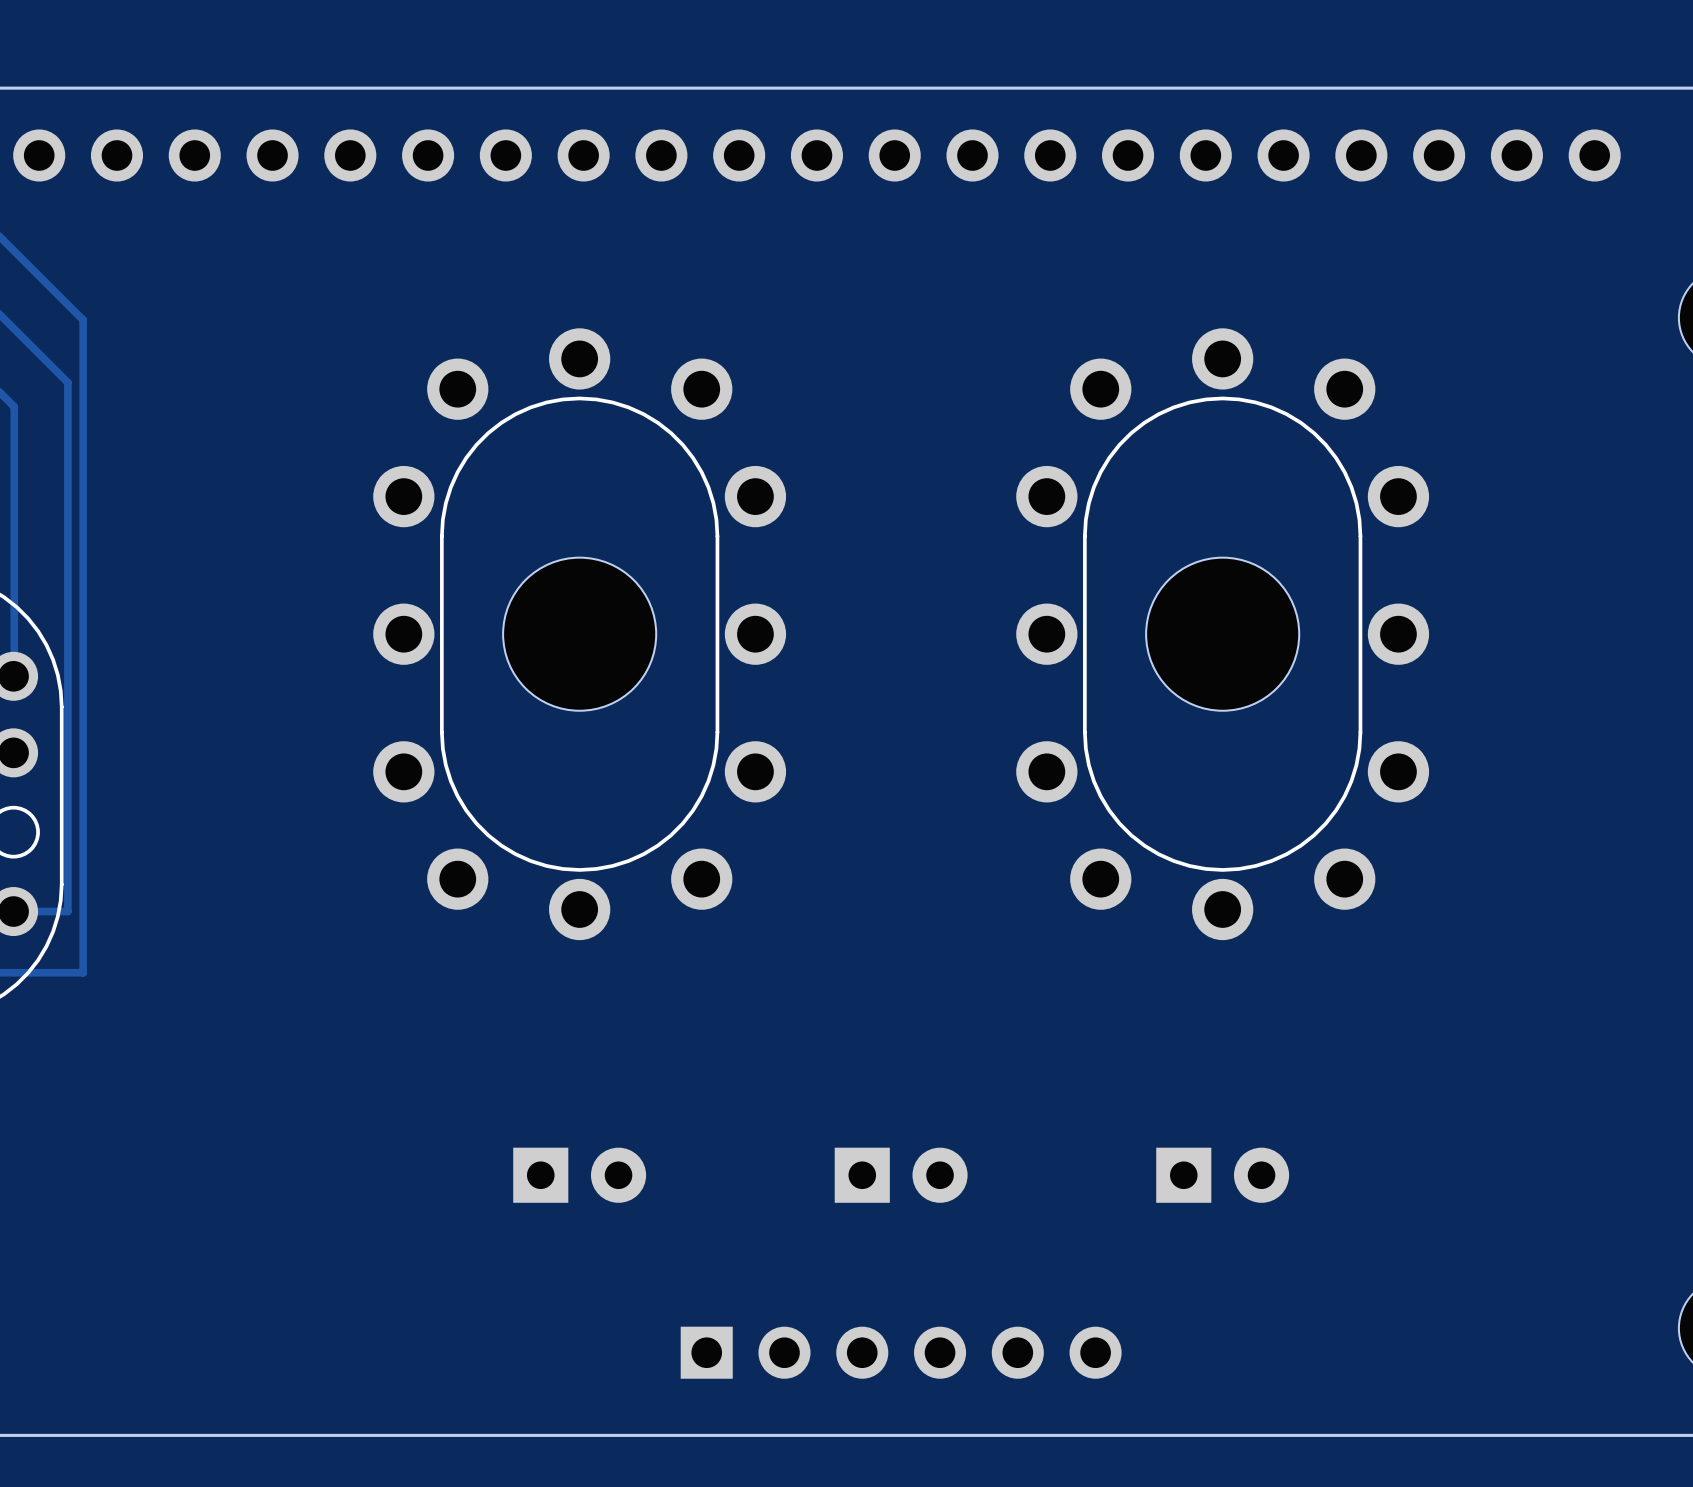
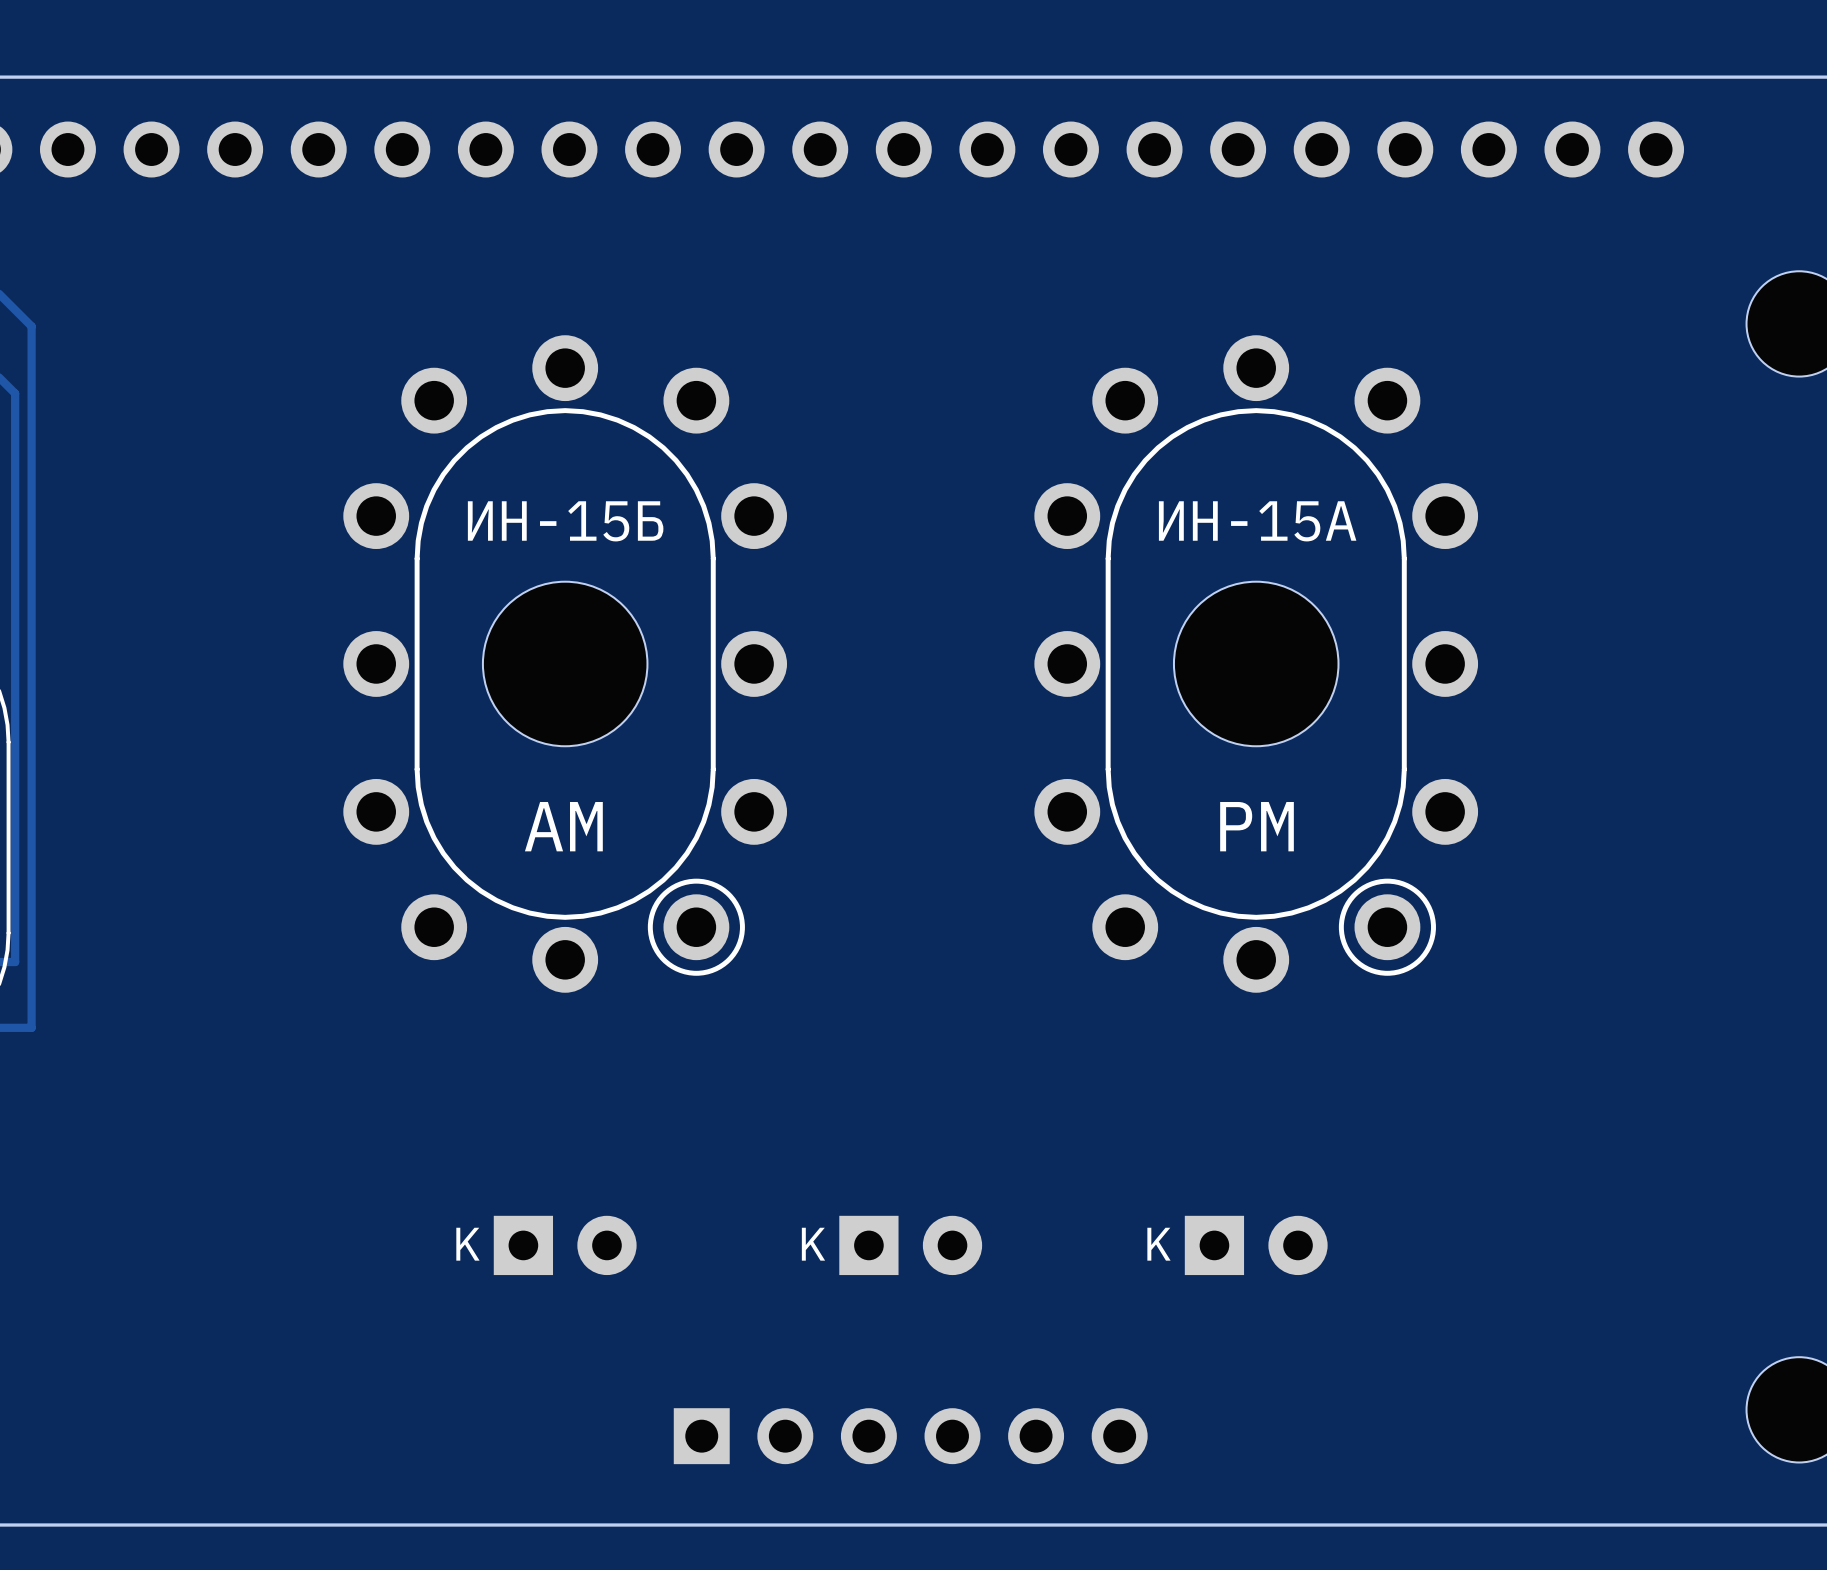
part footprint: [373, 328, 787, 941] -> [343, 335, 788, 993]
part footprint: [1016, 328, 1430, 941] -> [1034, 335, 1479, 993]
text: none -> ИН-15Б (565, 521)
text: none -> ИН-15А (1257, 521)
text: none -> AM (563, 826)
text: none -> PM (1257, 826)
part text: none -> K (467, 1244)
part text: none -> K (813, 1244)
part text: none -> K (1158, 1244)

